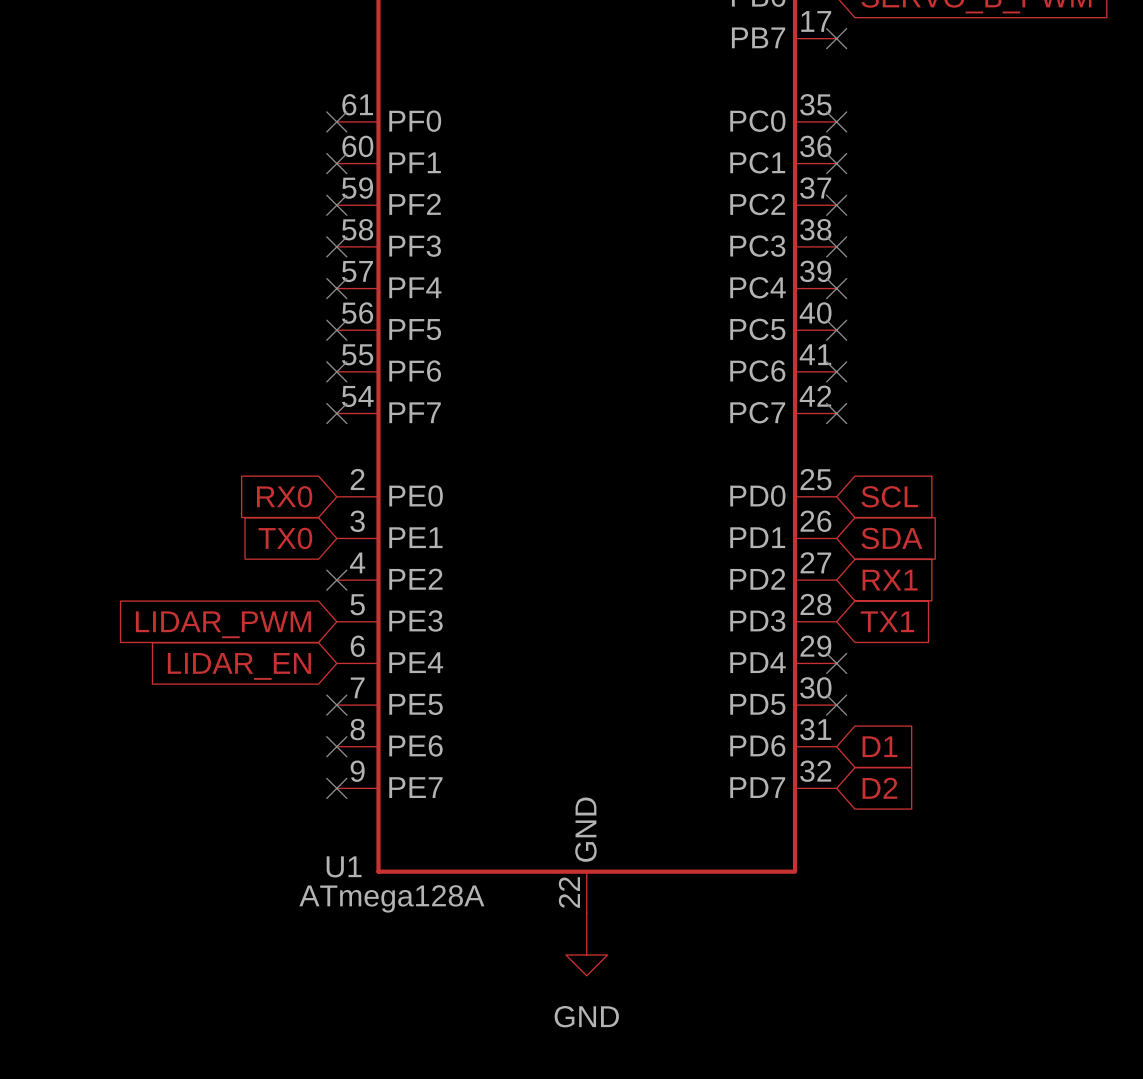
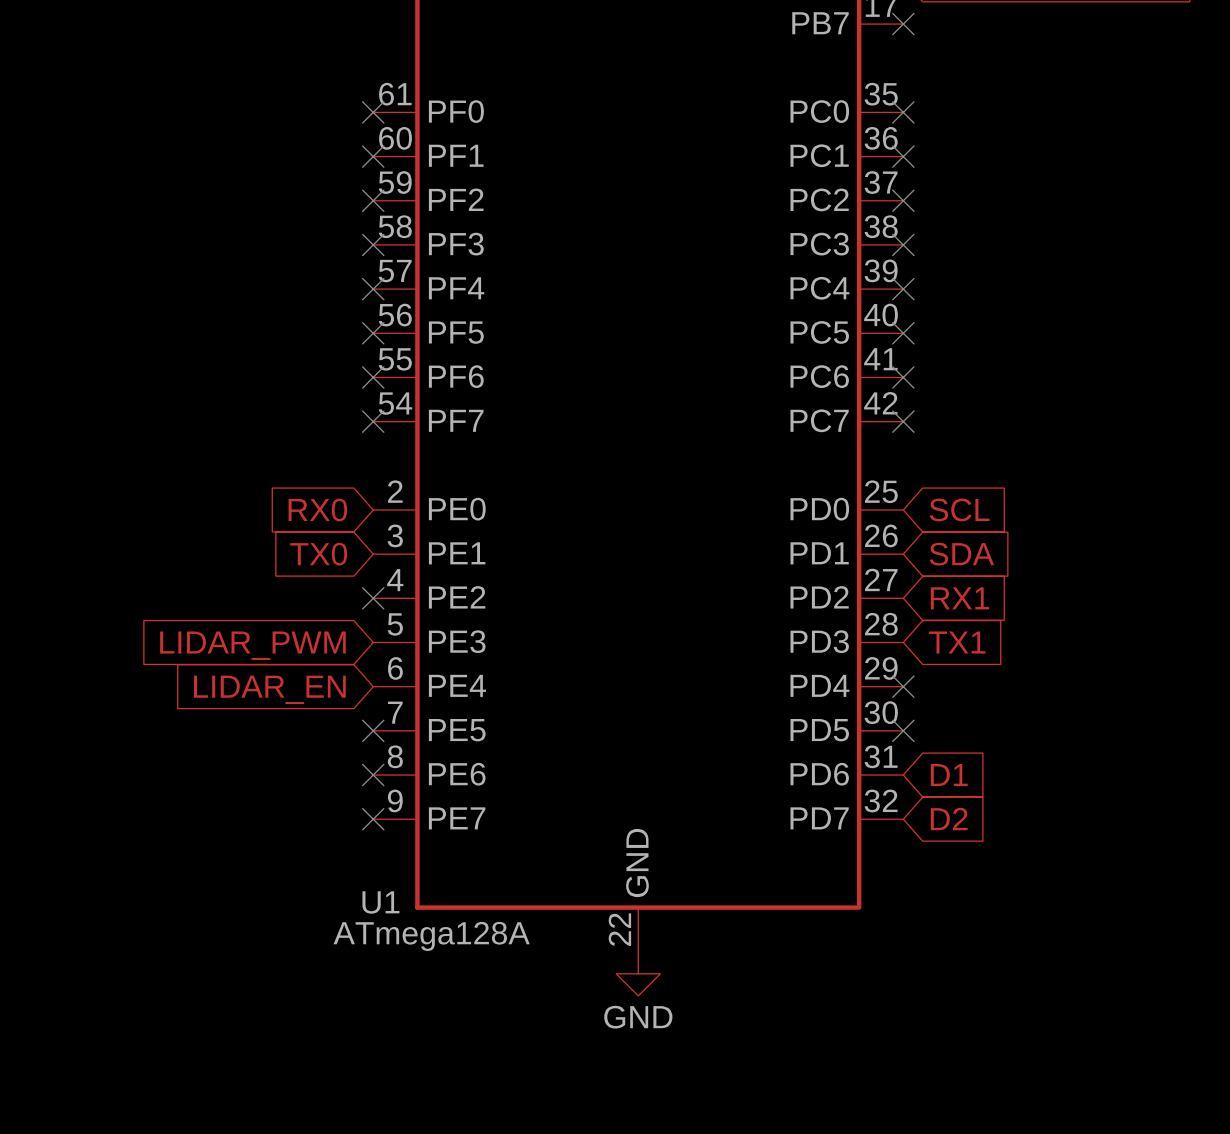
power symbol shape: [565, 913, 608, 976] -> [616, 951, 661, 996]

